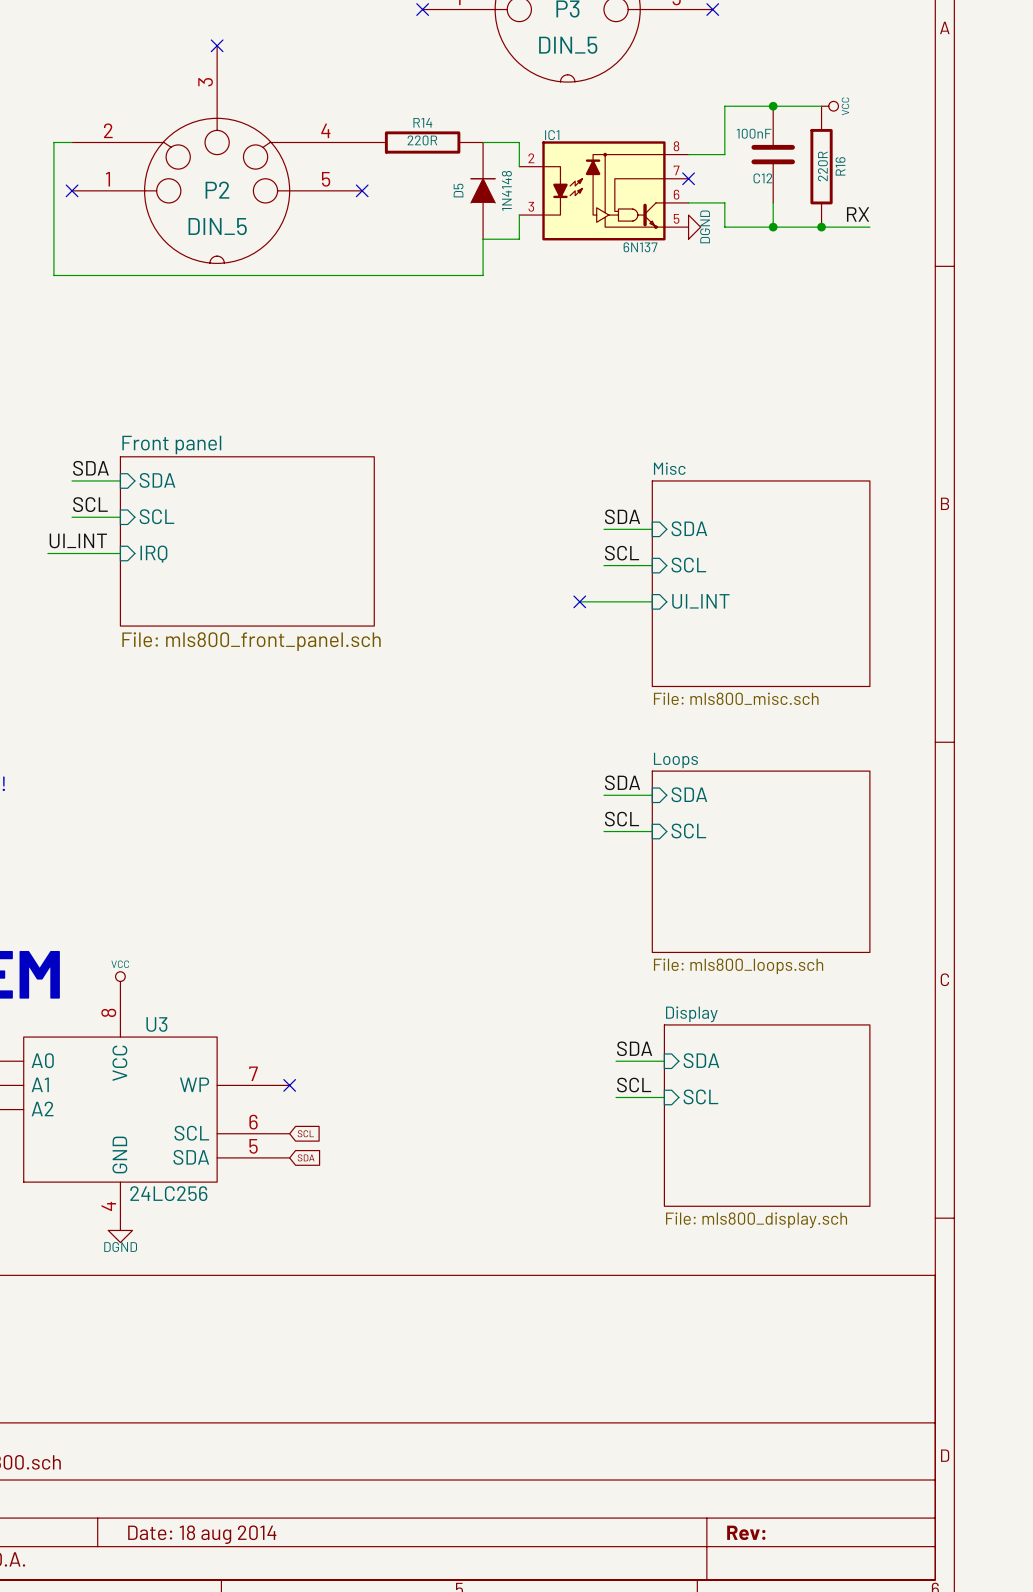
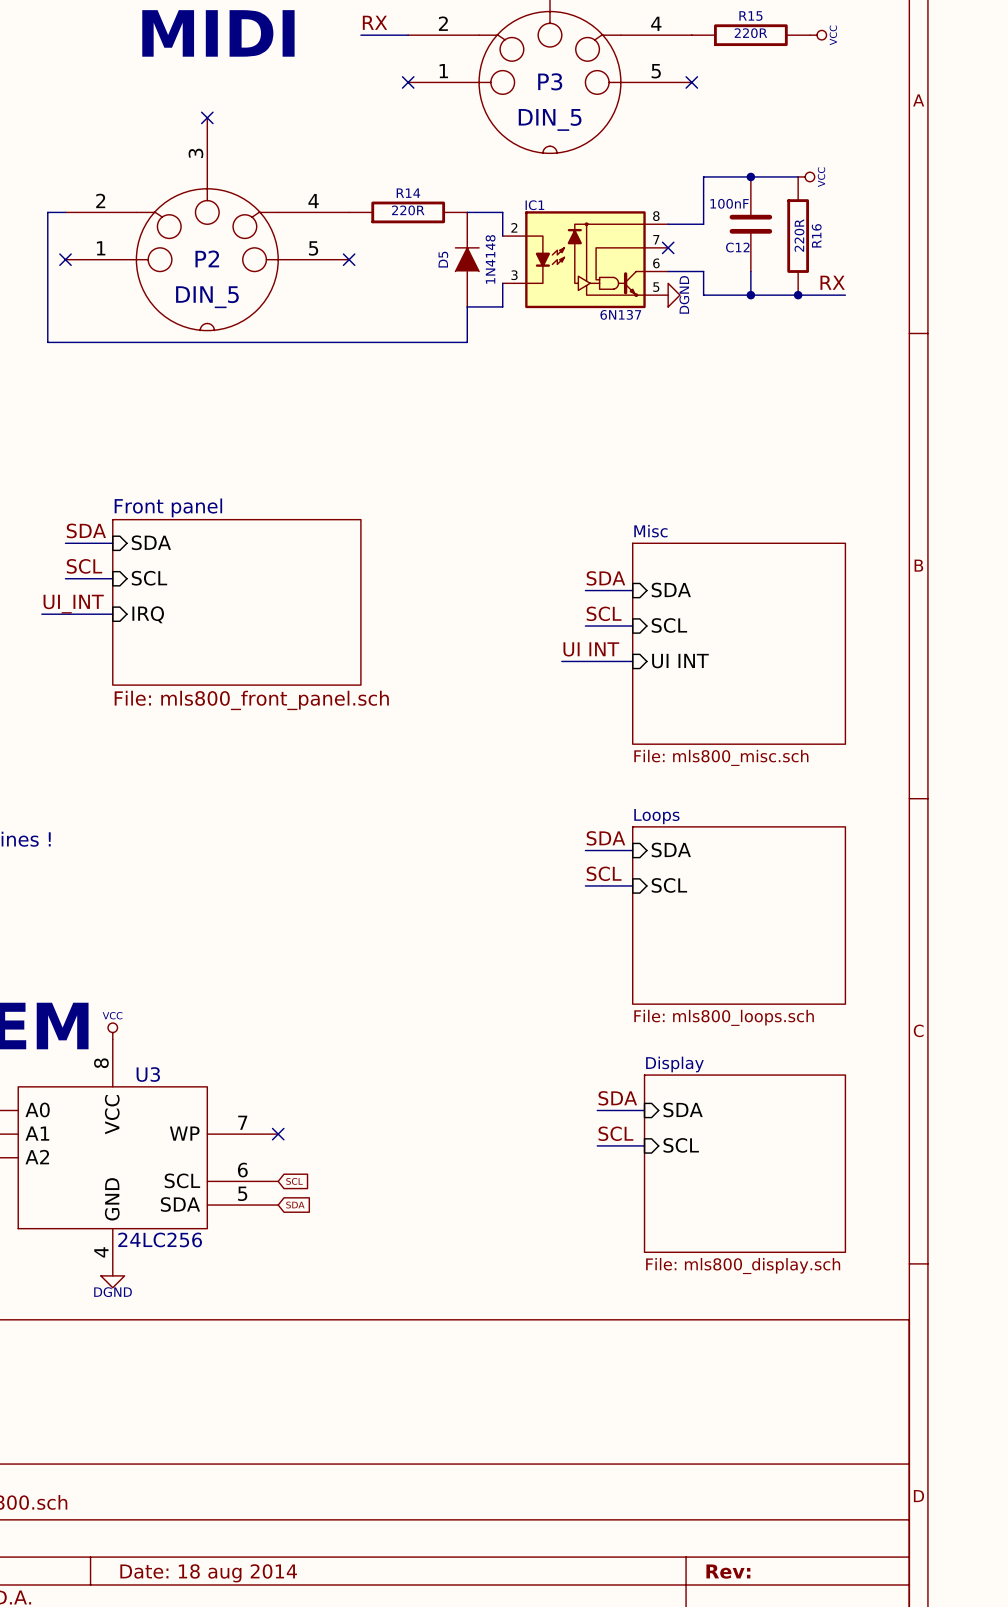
label: none -> UI INT (591, 649)
no-connect mark: (579, 601) -> none
sheet pin: UI_INT (700, 601) -> UI INT (680, 661)

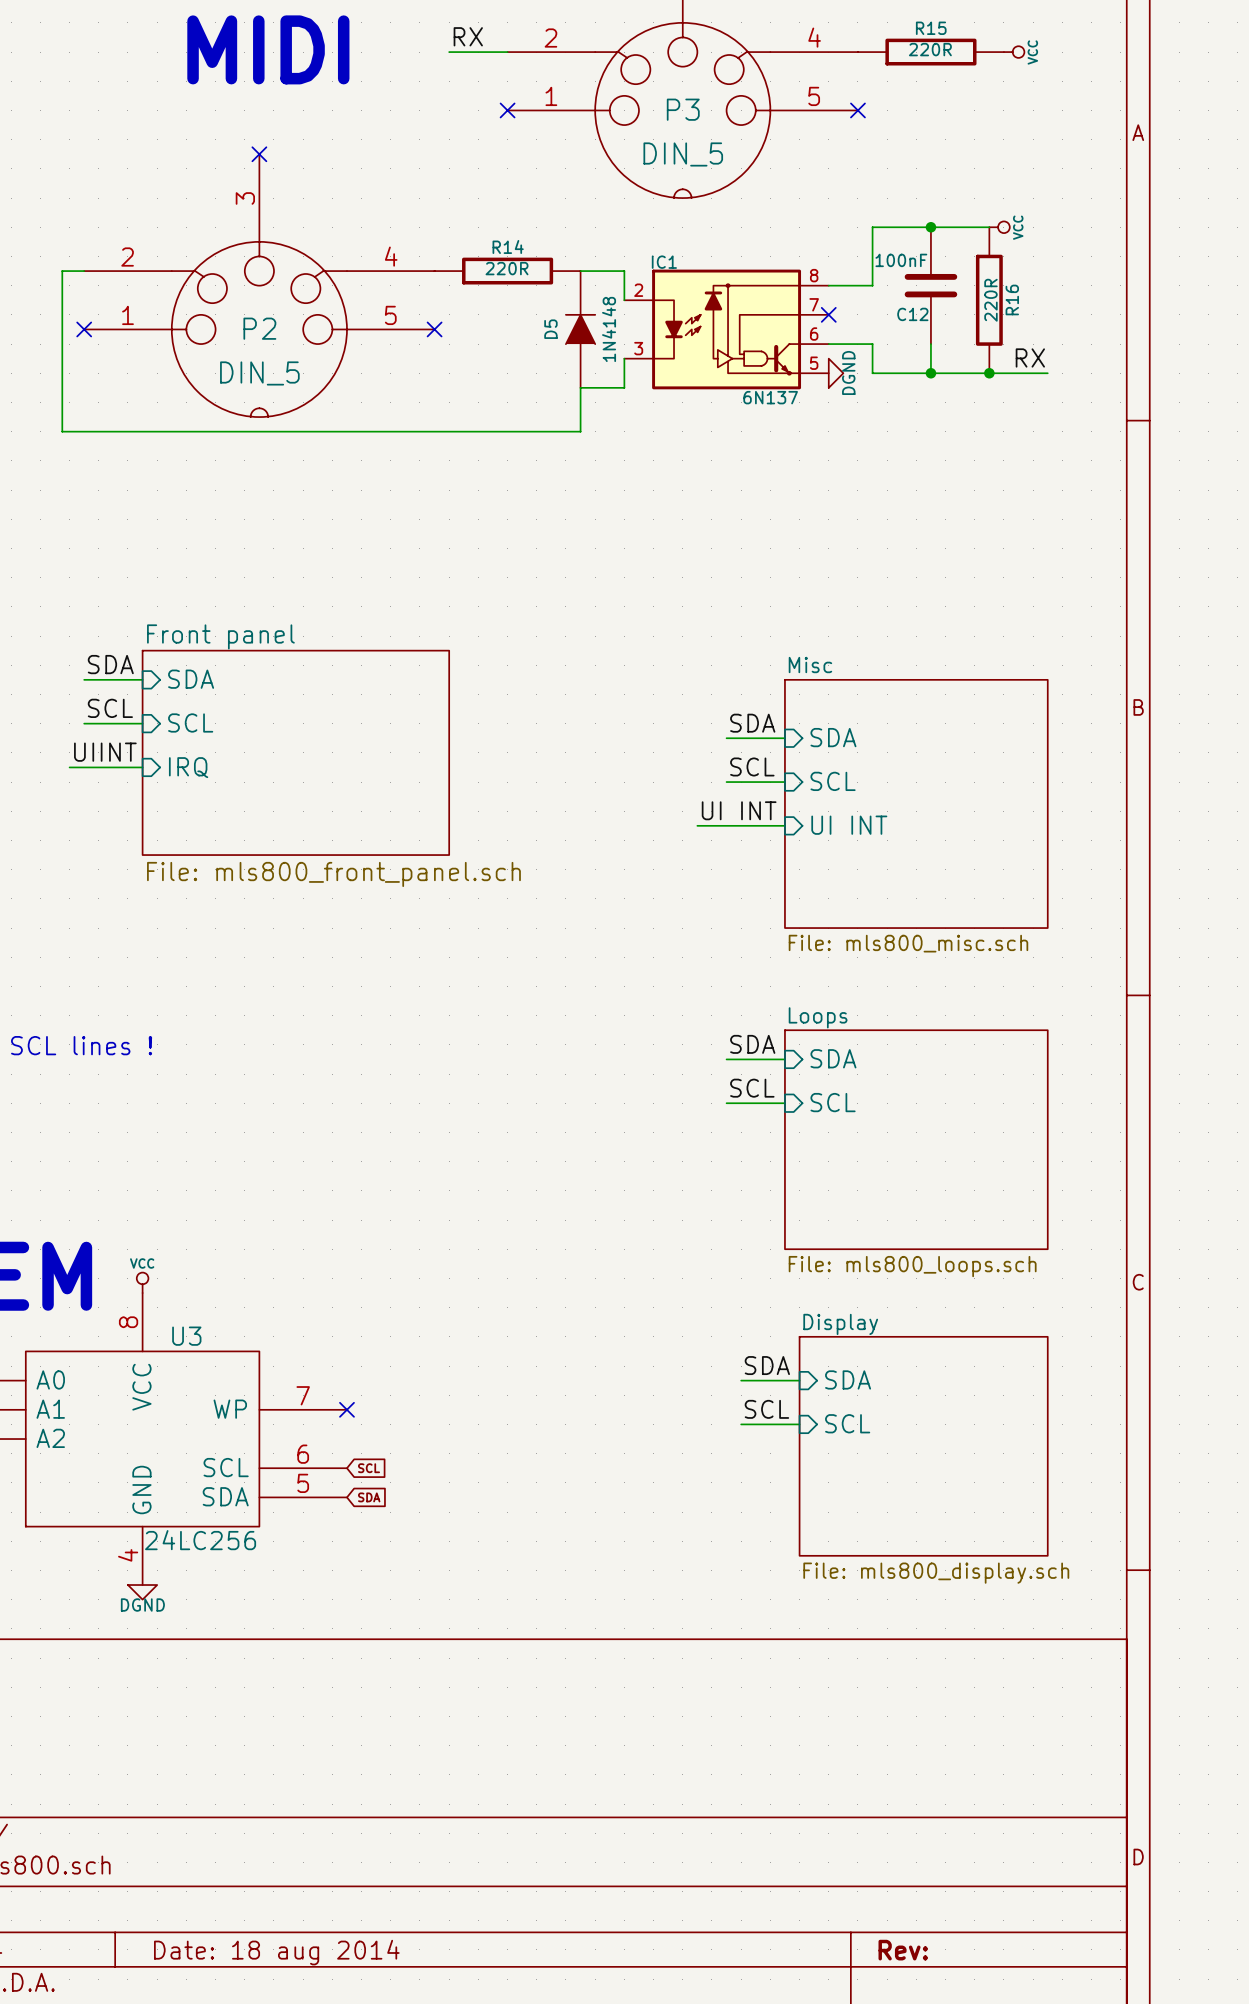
label: UI_INT (73, 604) -> UIINT (105, 752)
wire: (41, 614) (53, 614) -> none

